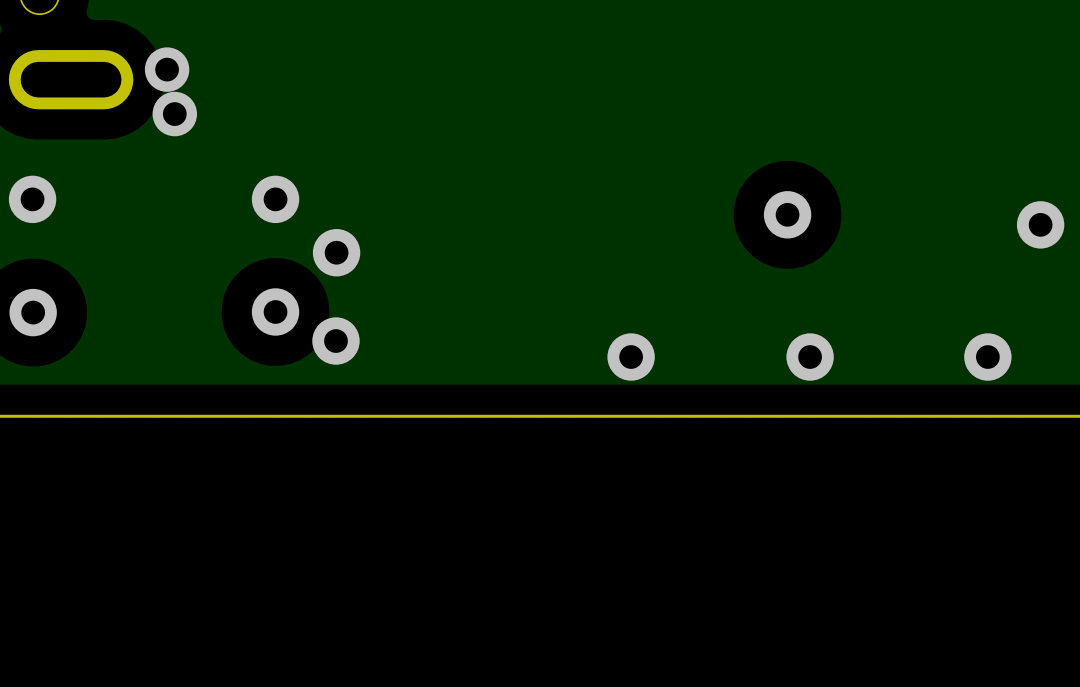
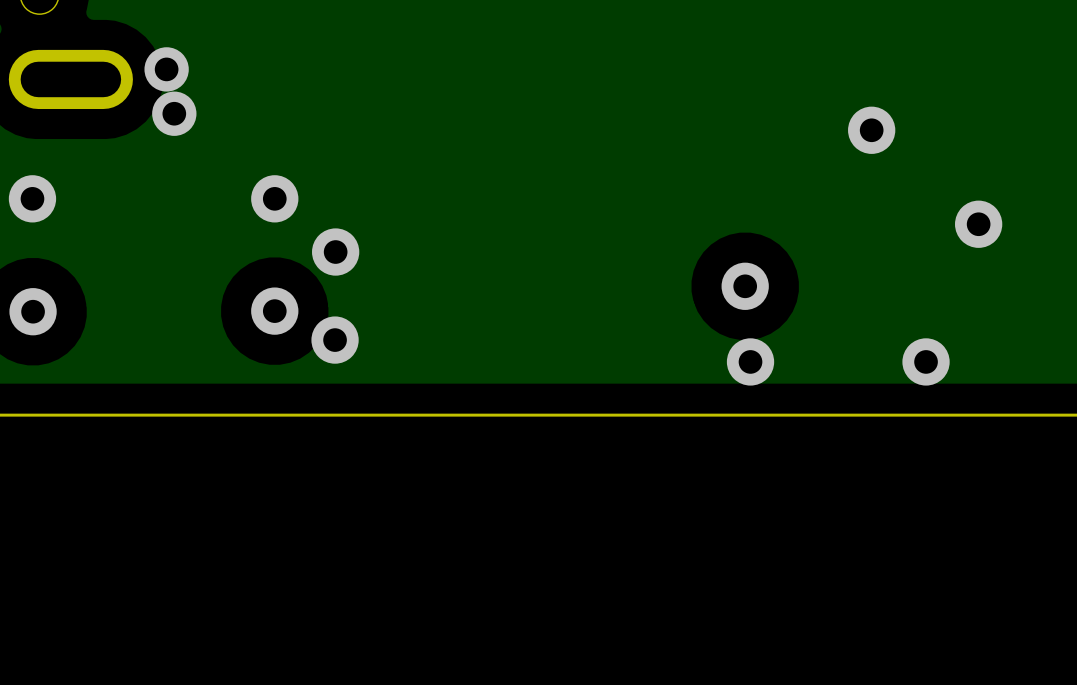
via: none -> (871, 130)
via: (787, 214) -> none
via position: (1040, 224) -> (978, 224)
via: none -> (745, 286)
via: (631, 357) -> none
via: (810, 357) -> none
via: (987, 357) -> none
via: none -> (750, 361)
via: none -> (926, 361)

